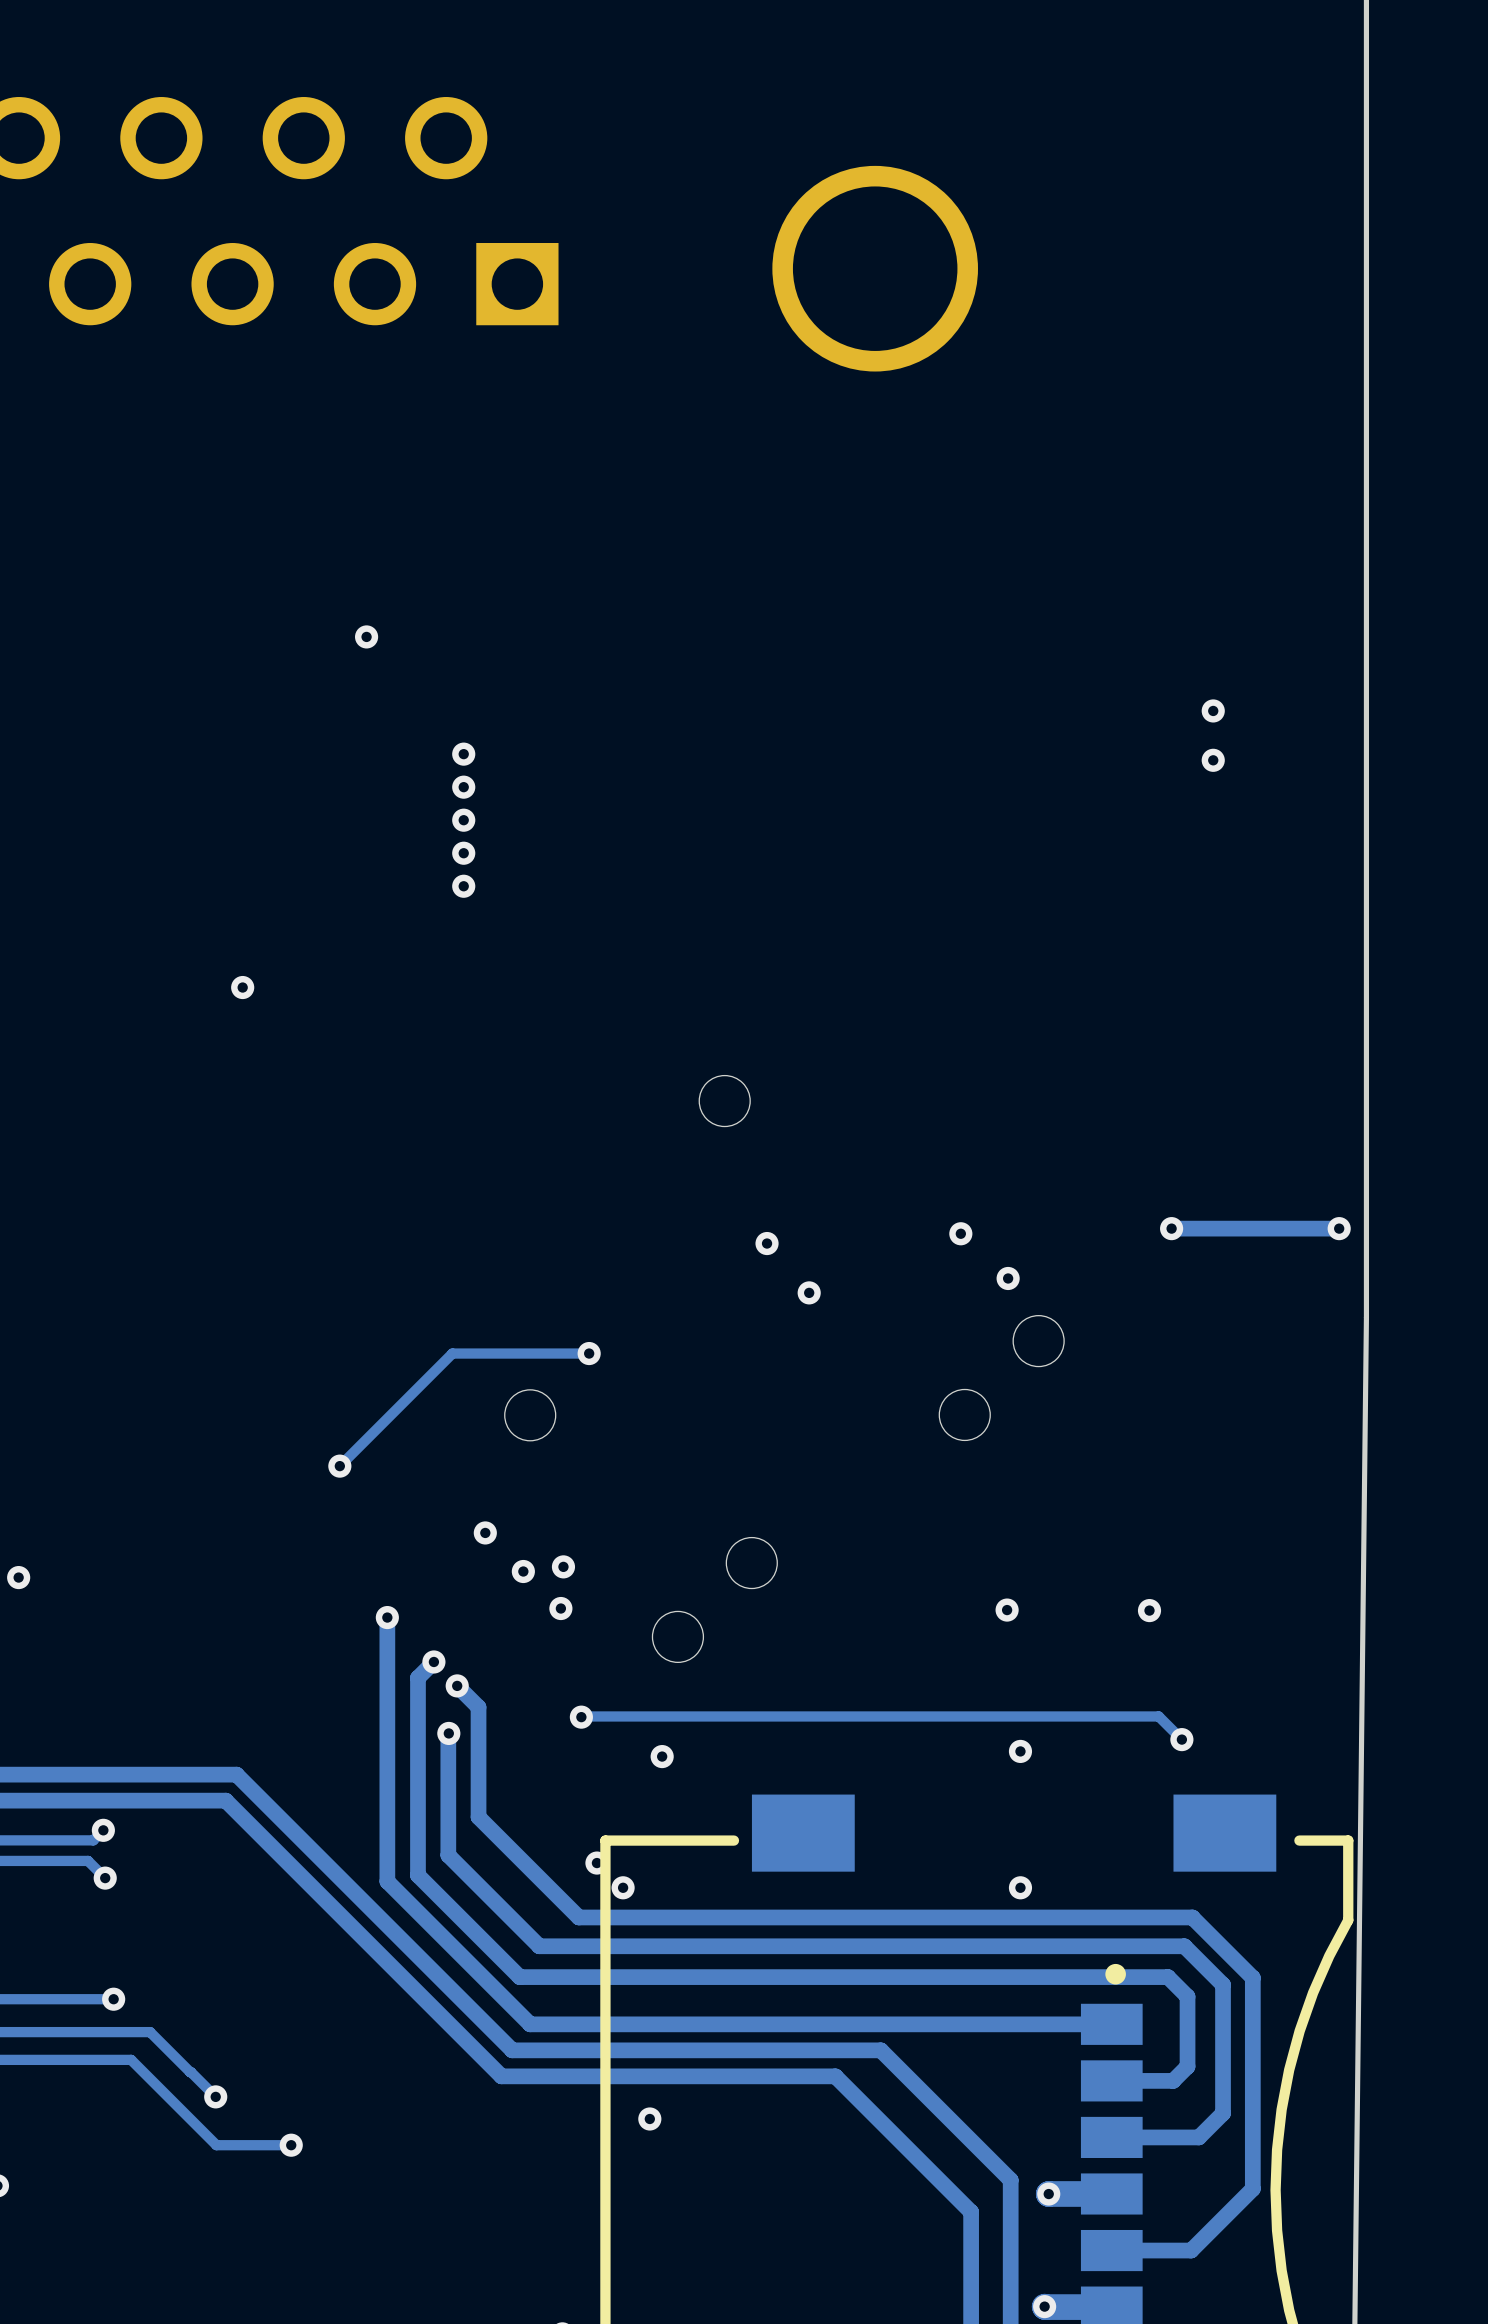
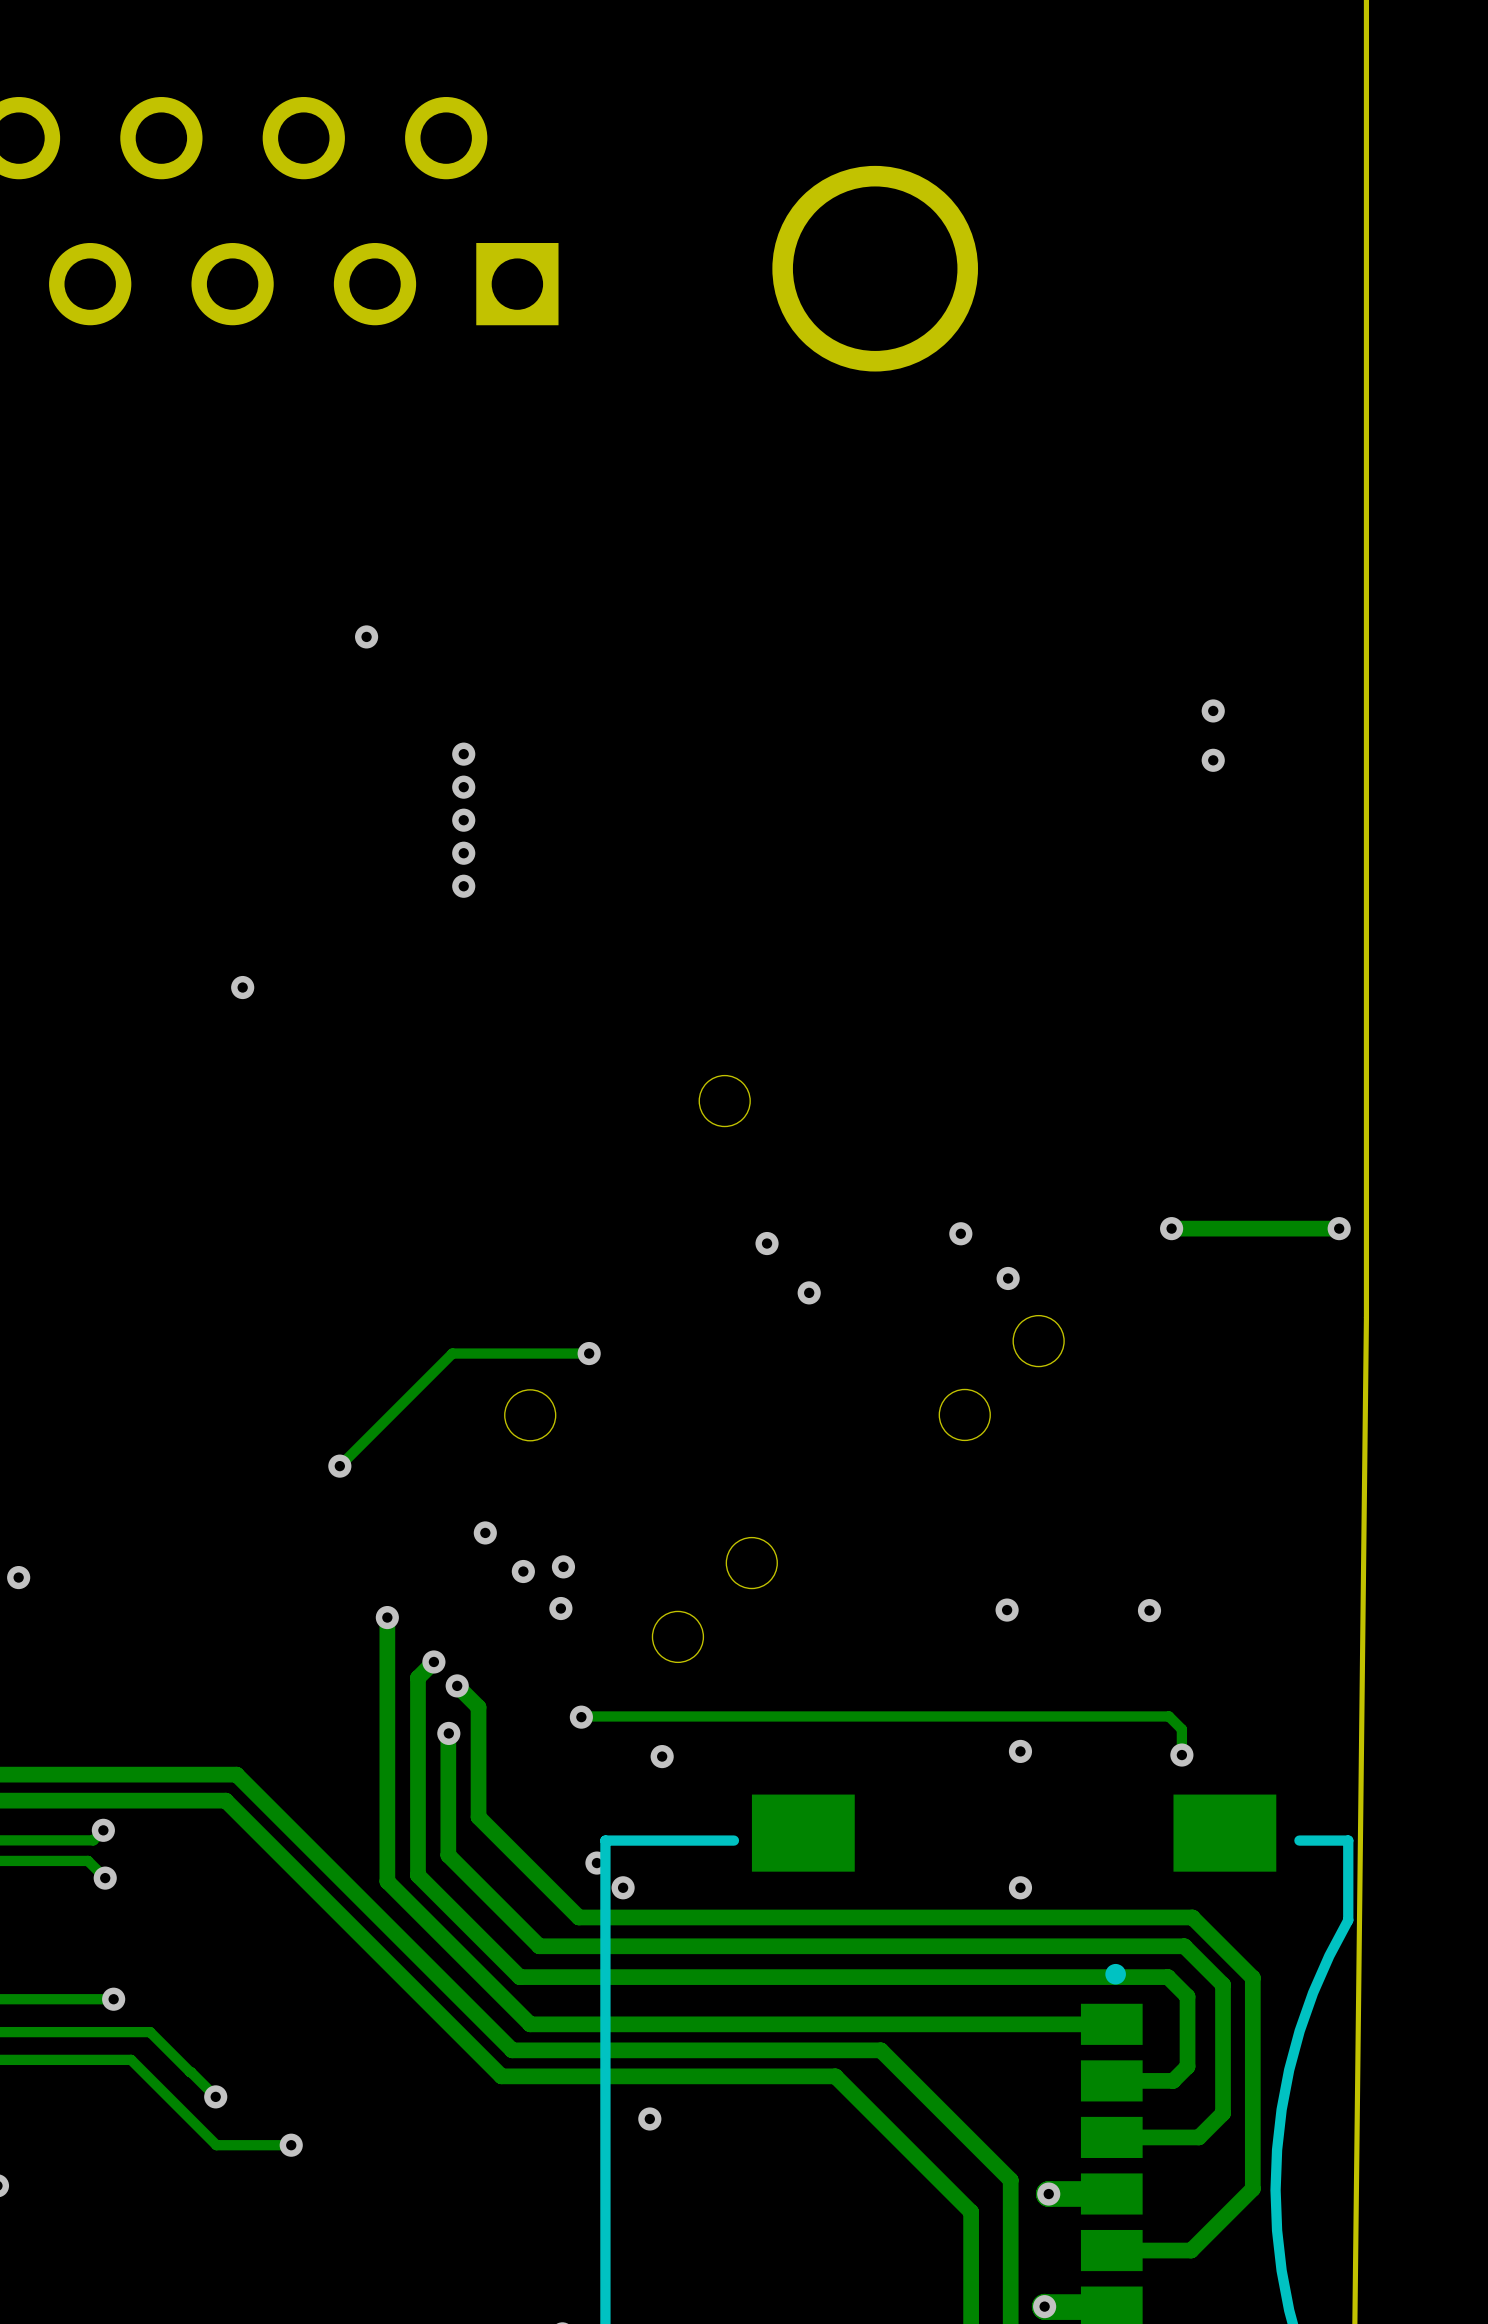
track: (1158, 1716) (1181, 1739) -> (1158, 1716) (1169, 1716) (1181, 1729) (1181, 1755)
via position: (1181, 1739) -> (1181, 1755)

